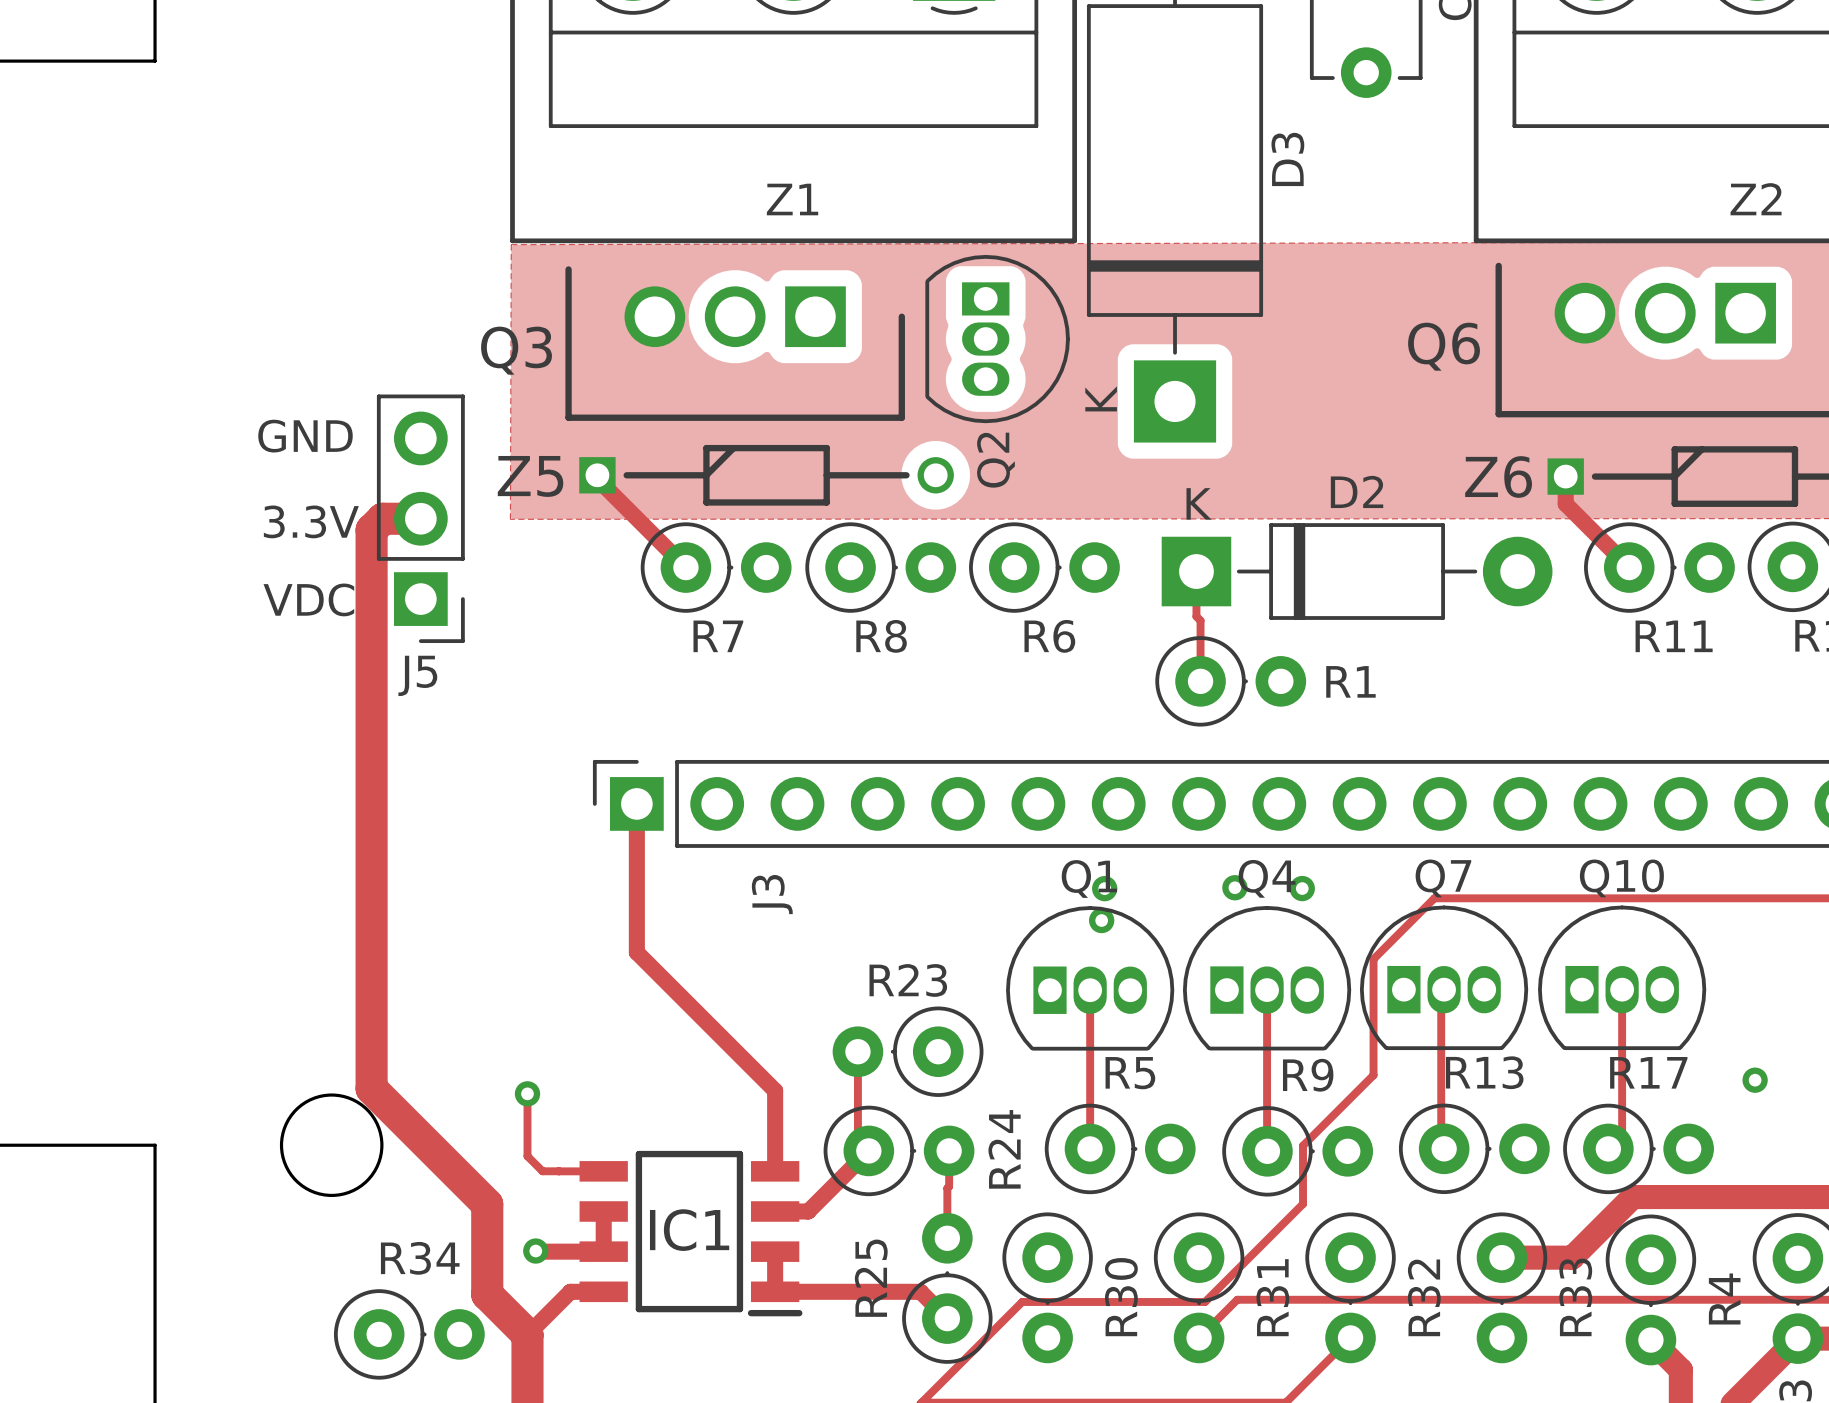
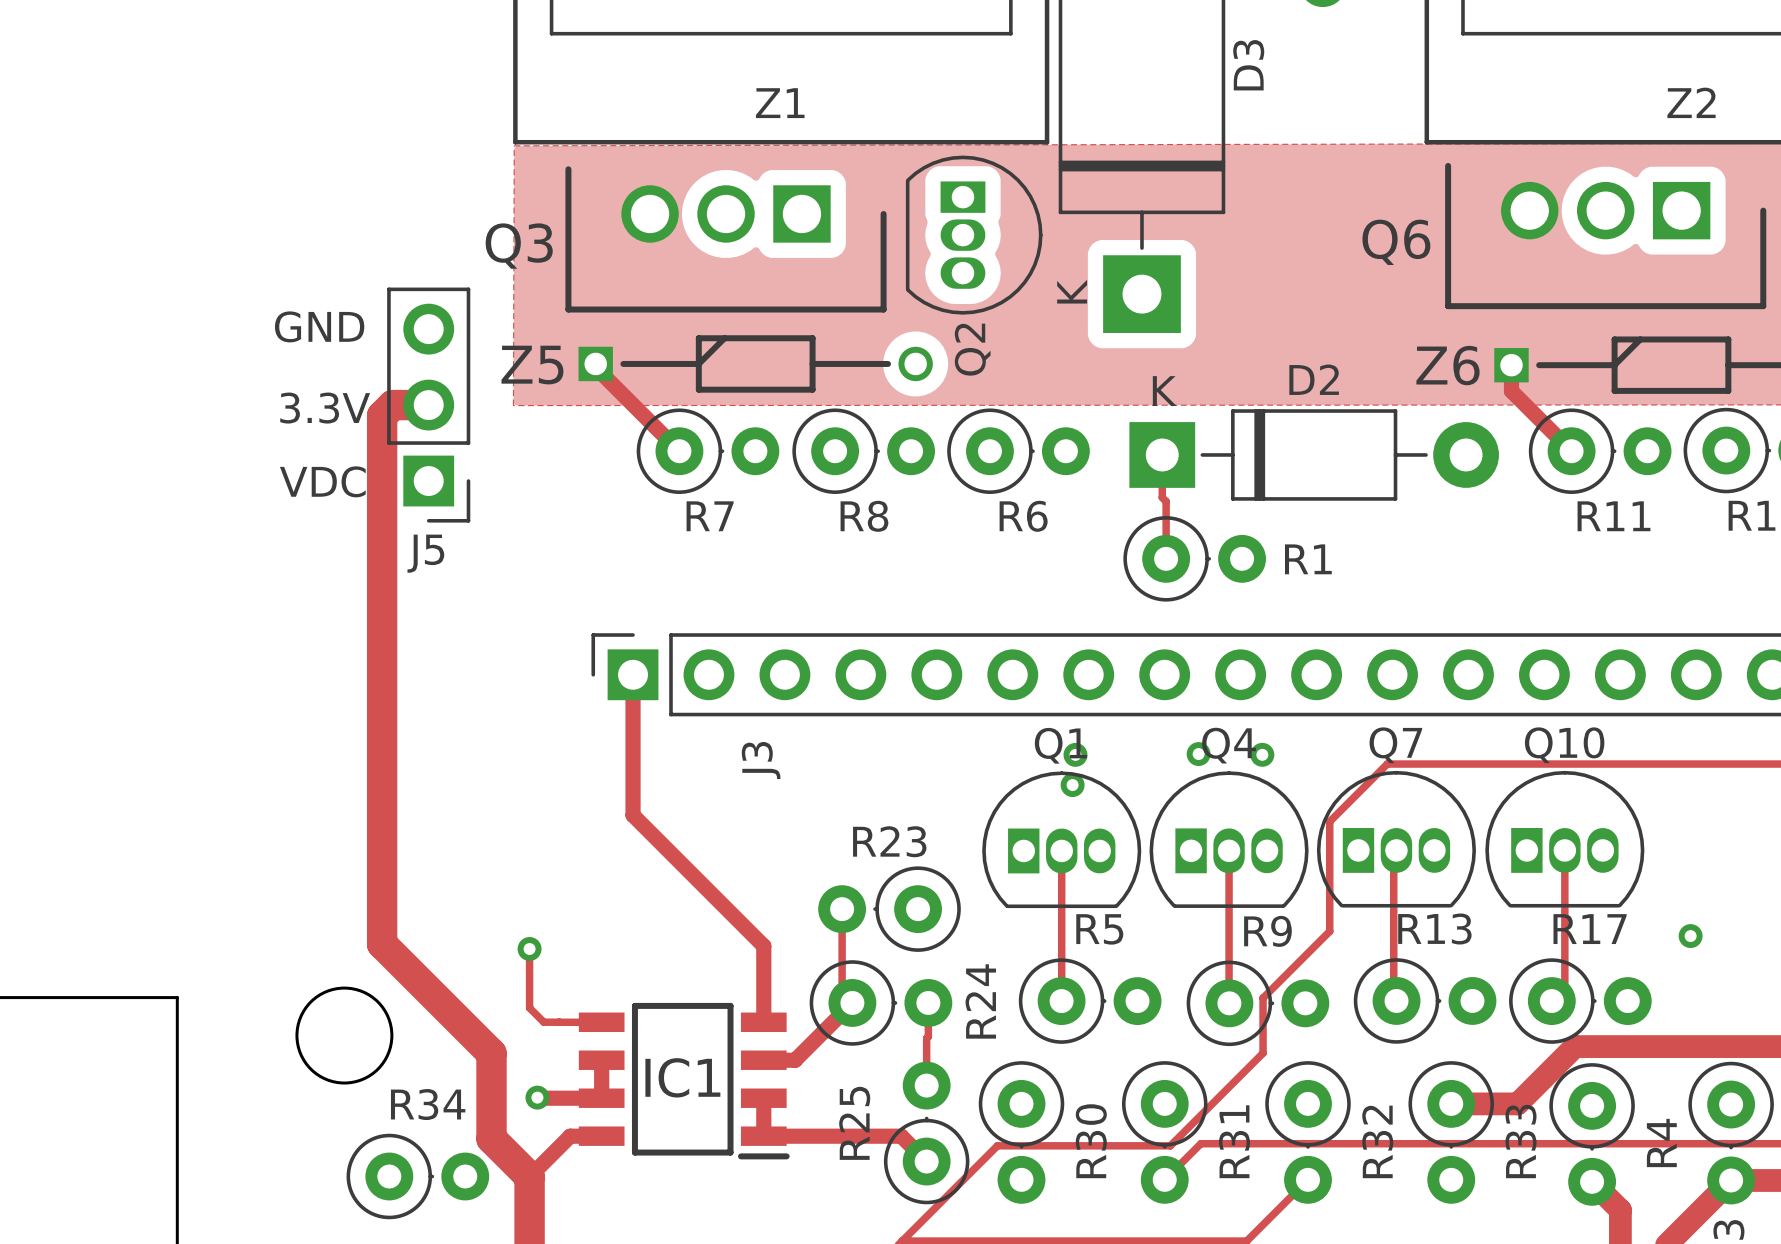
round board edge position: (331, 1145) -> (344, 1035)

